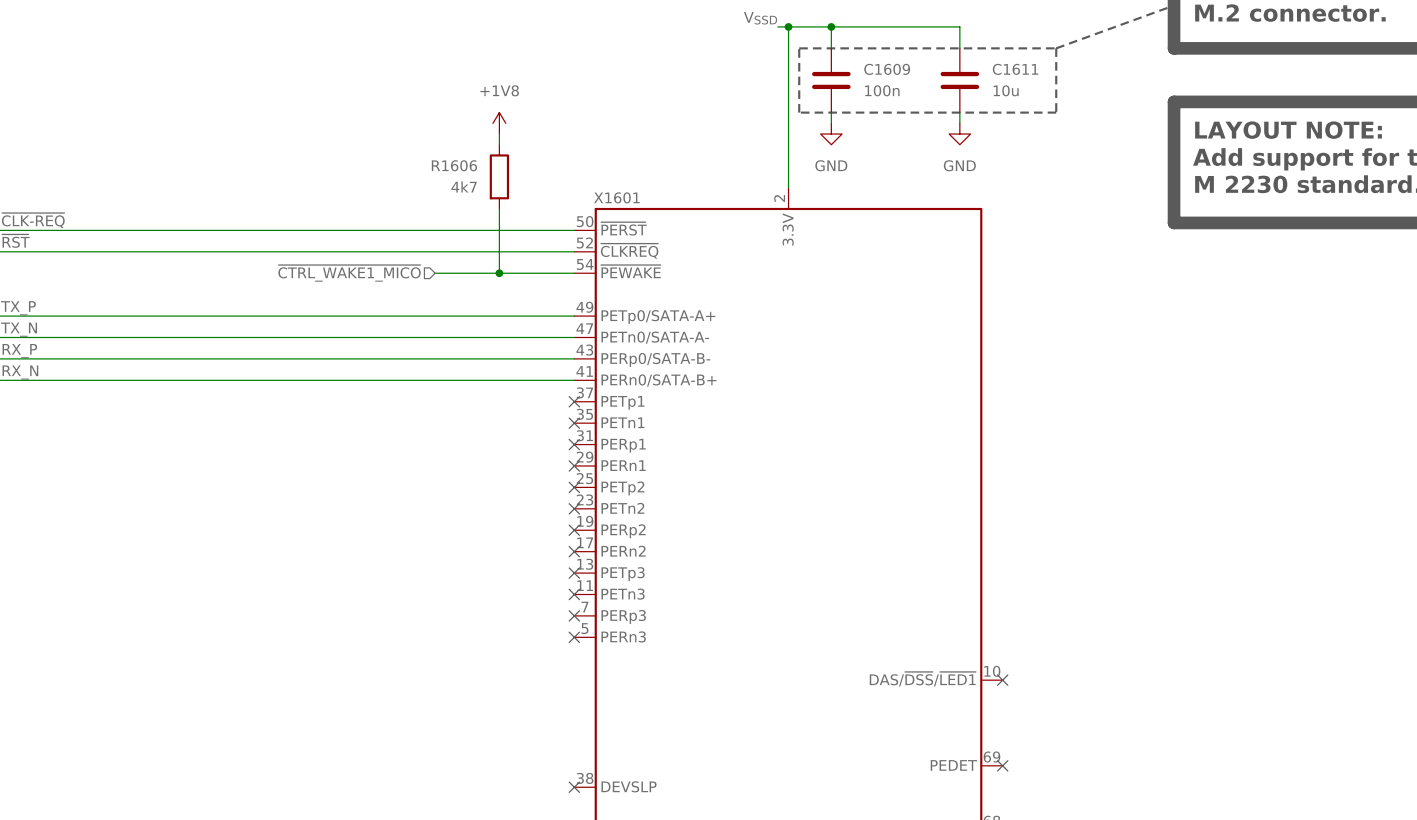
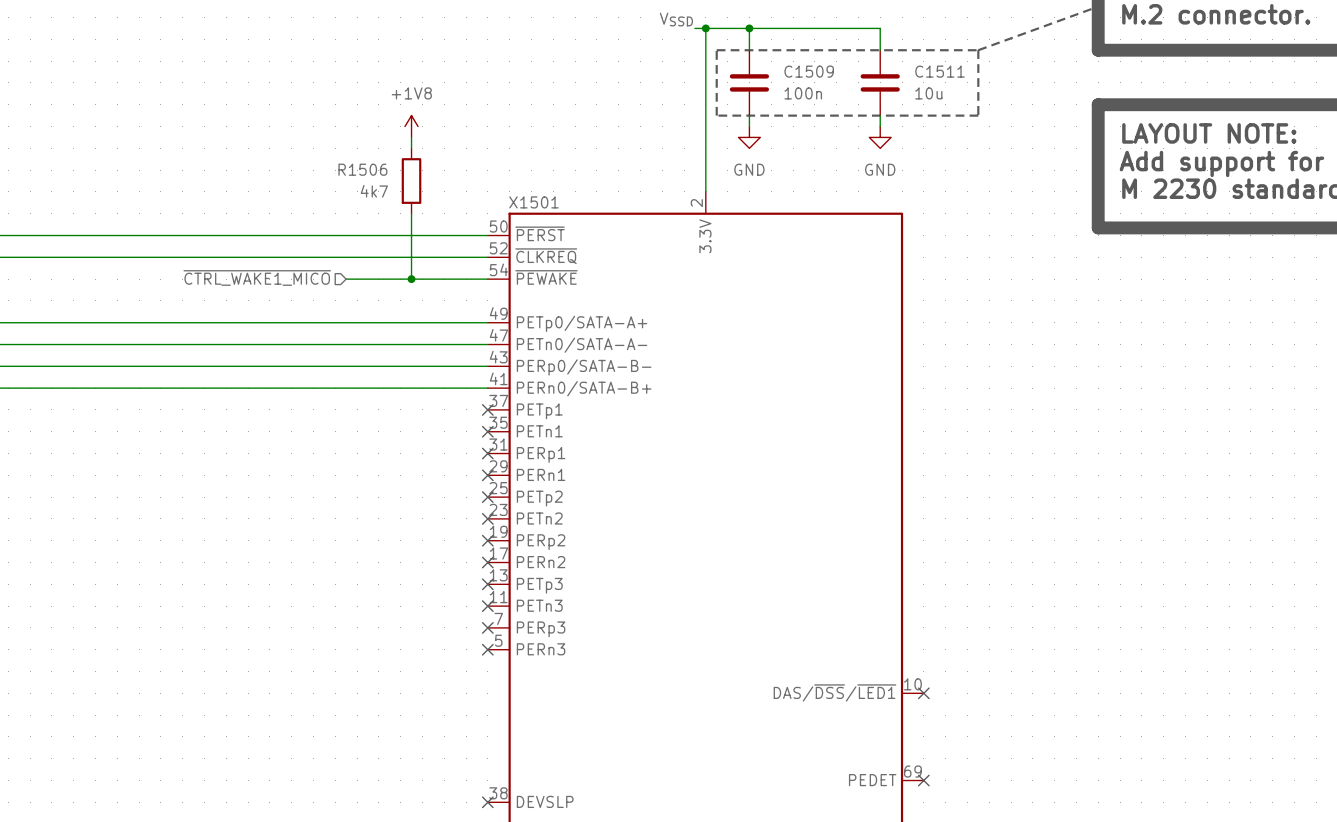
C1609 name: C1609 (887, 69) -> C1509 (809, 71)
C1611 name: C1611 (1015, 69) -> C1511 (939, 71)
R1606 name: R1606 (454, 165) -> R1506 (362, 169)
X1601 name: X1601 (616, 197) -> X1501 (534, 202)

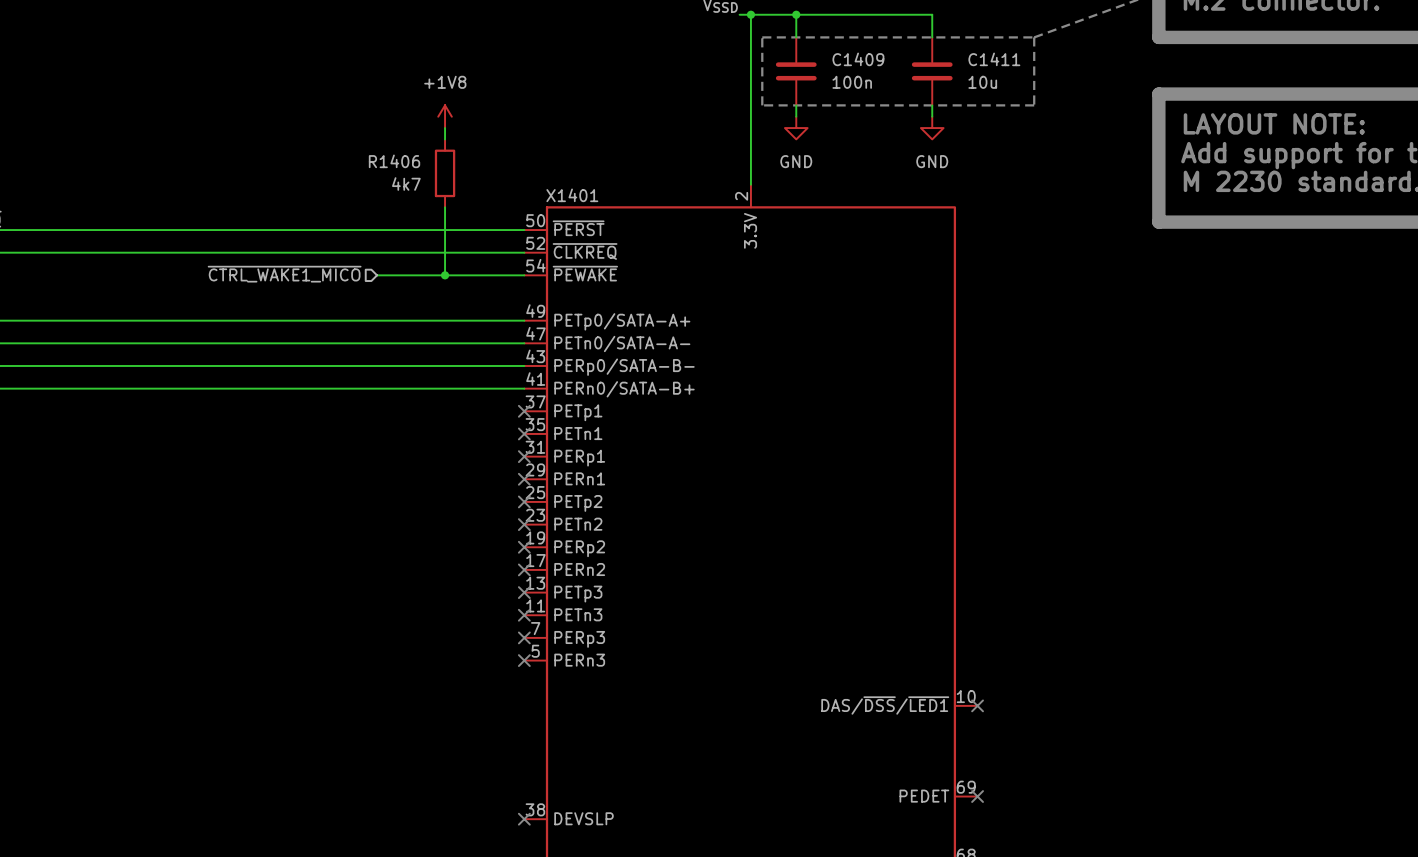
C1509 name: C1509 (809, 71) -> C1409 (858, 59)
C1511 name: C1511 (939, 71) -> C1411 (994, 59)
R1506 name: R1506 (362, 169) -> R1406 (394, 161)
X1501 name: X1501 (534, 202) -> X1401 (572, 195)

